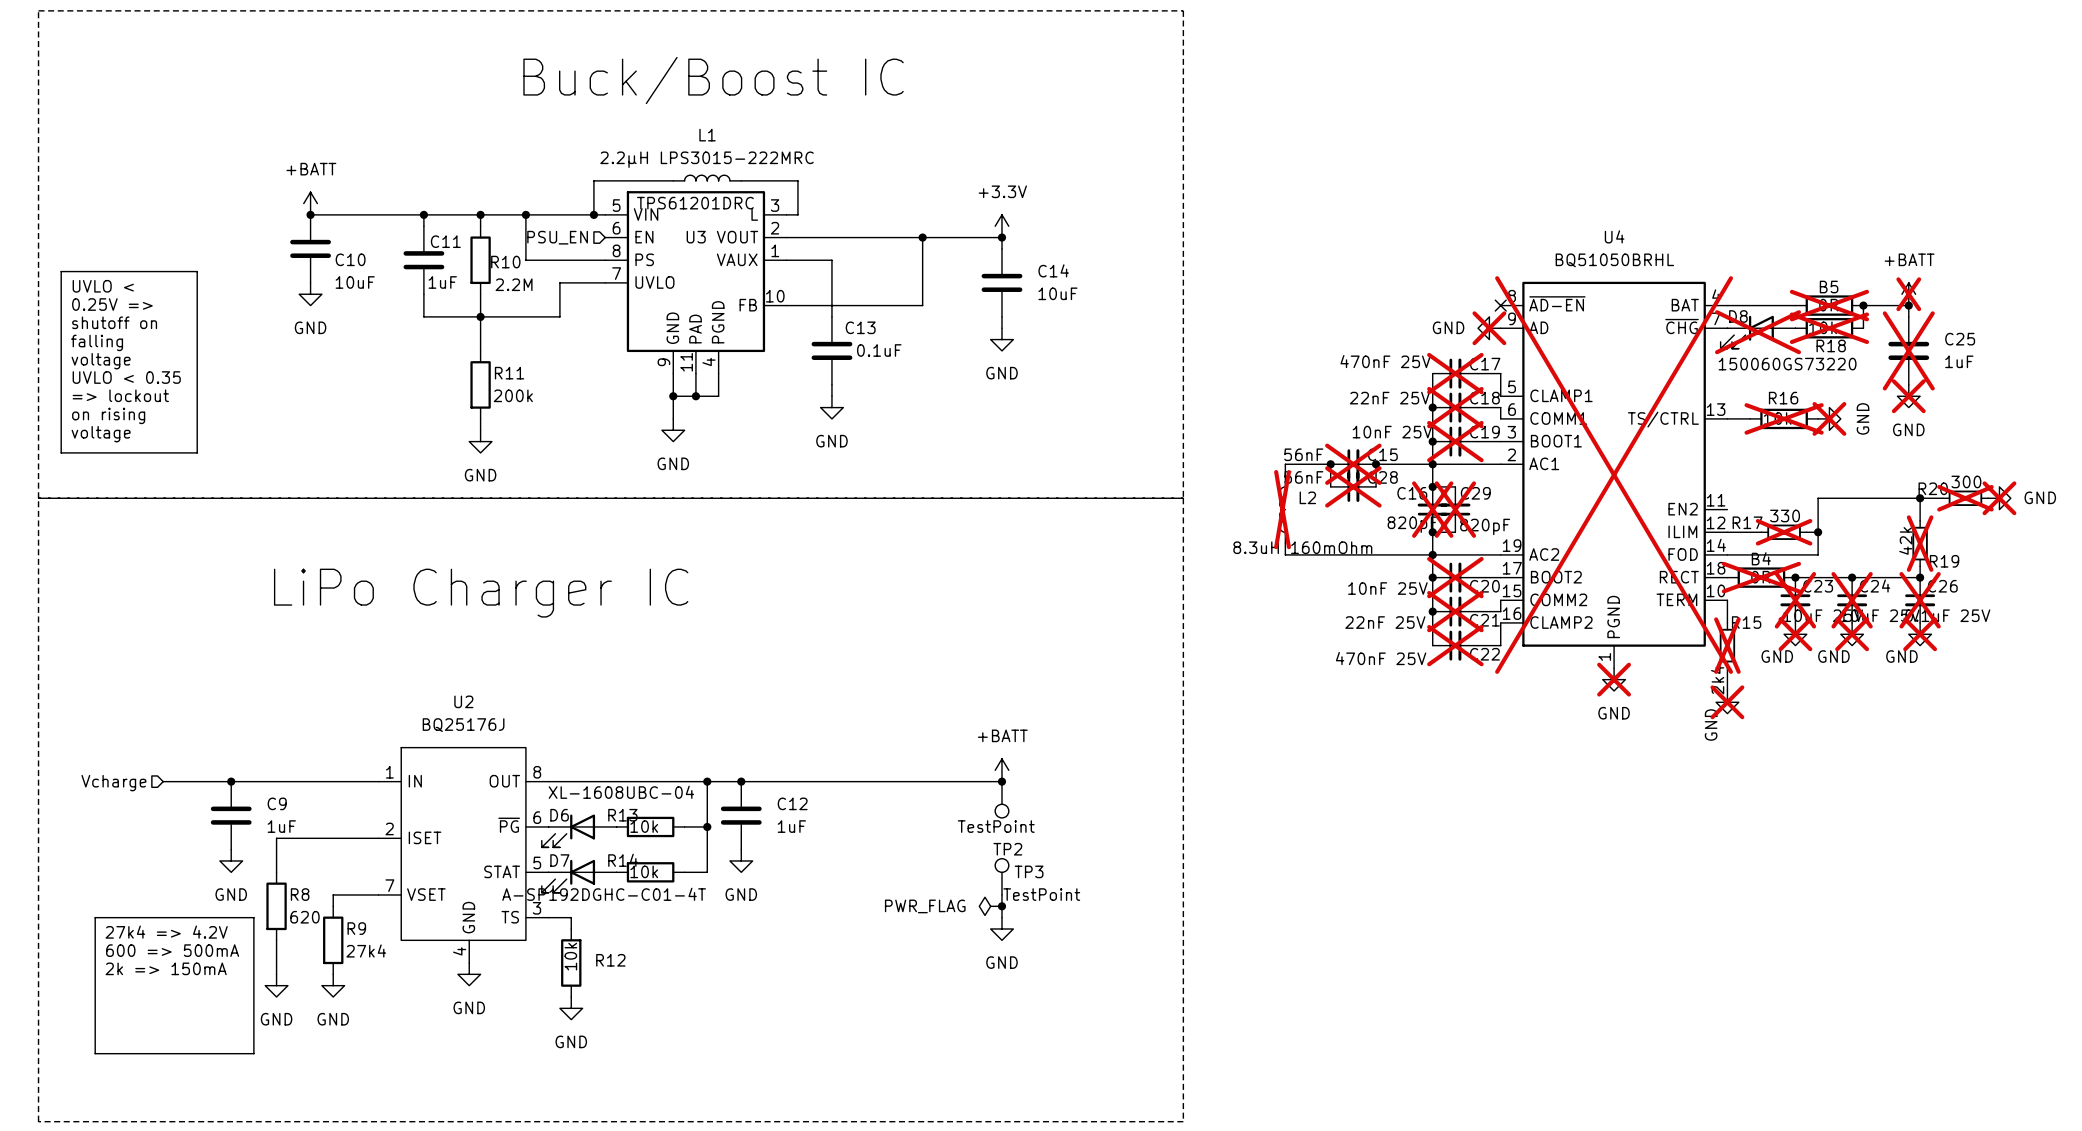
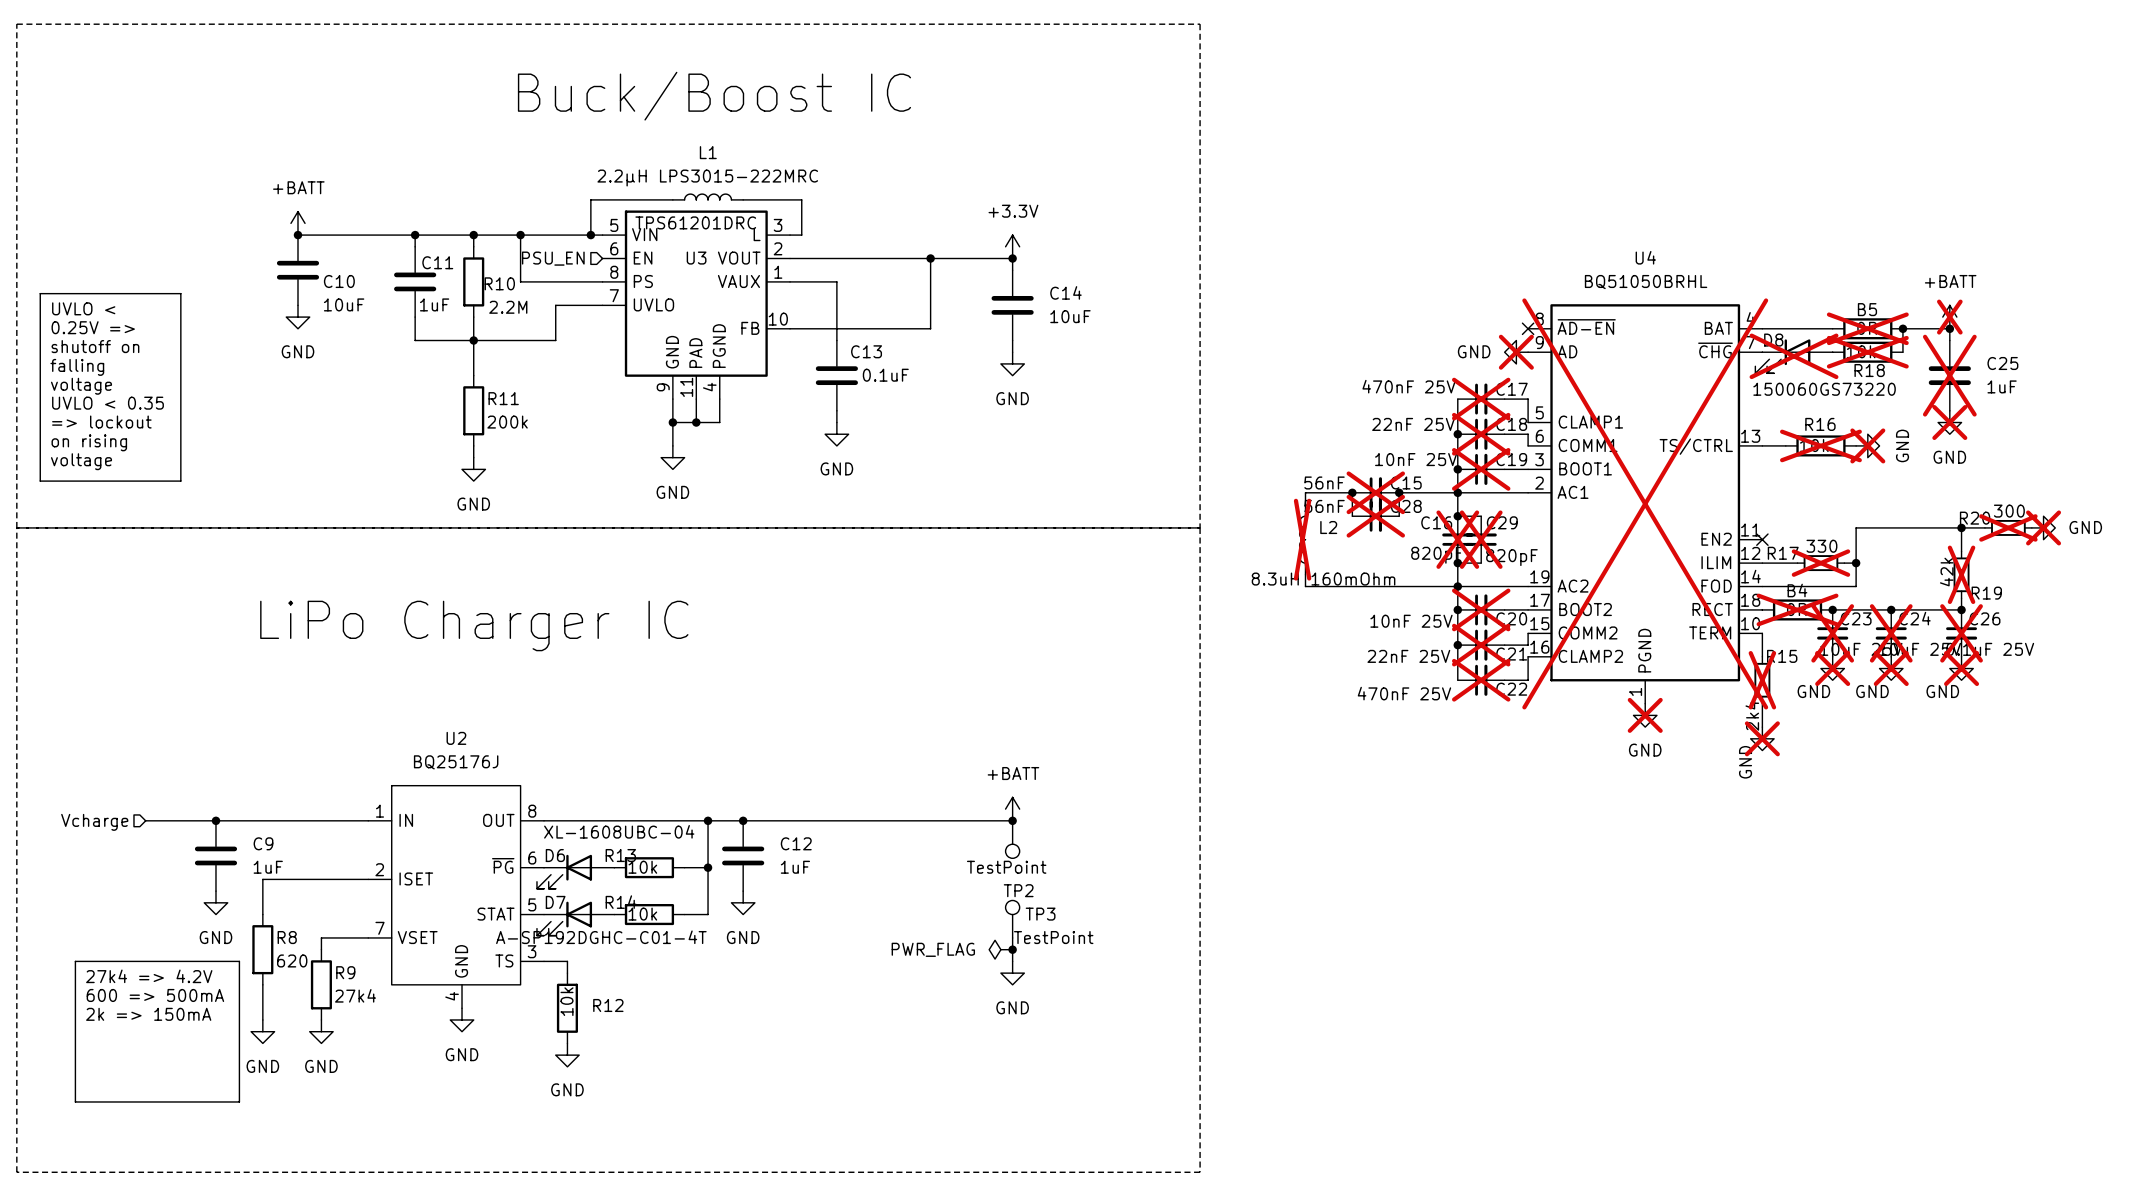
no-connect mark: none -> (1762, 539)

